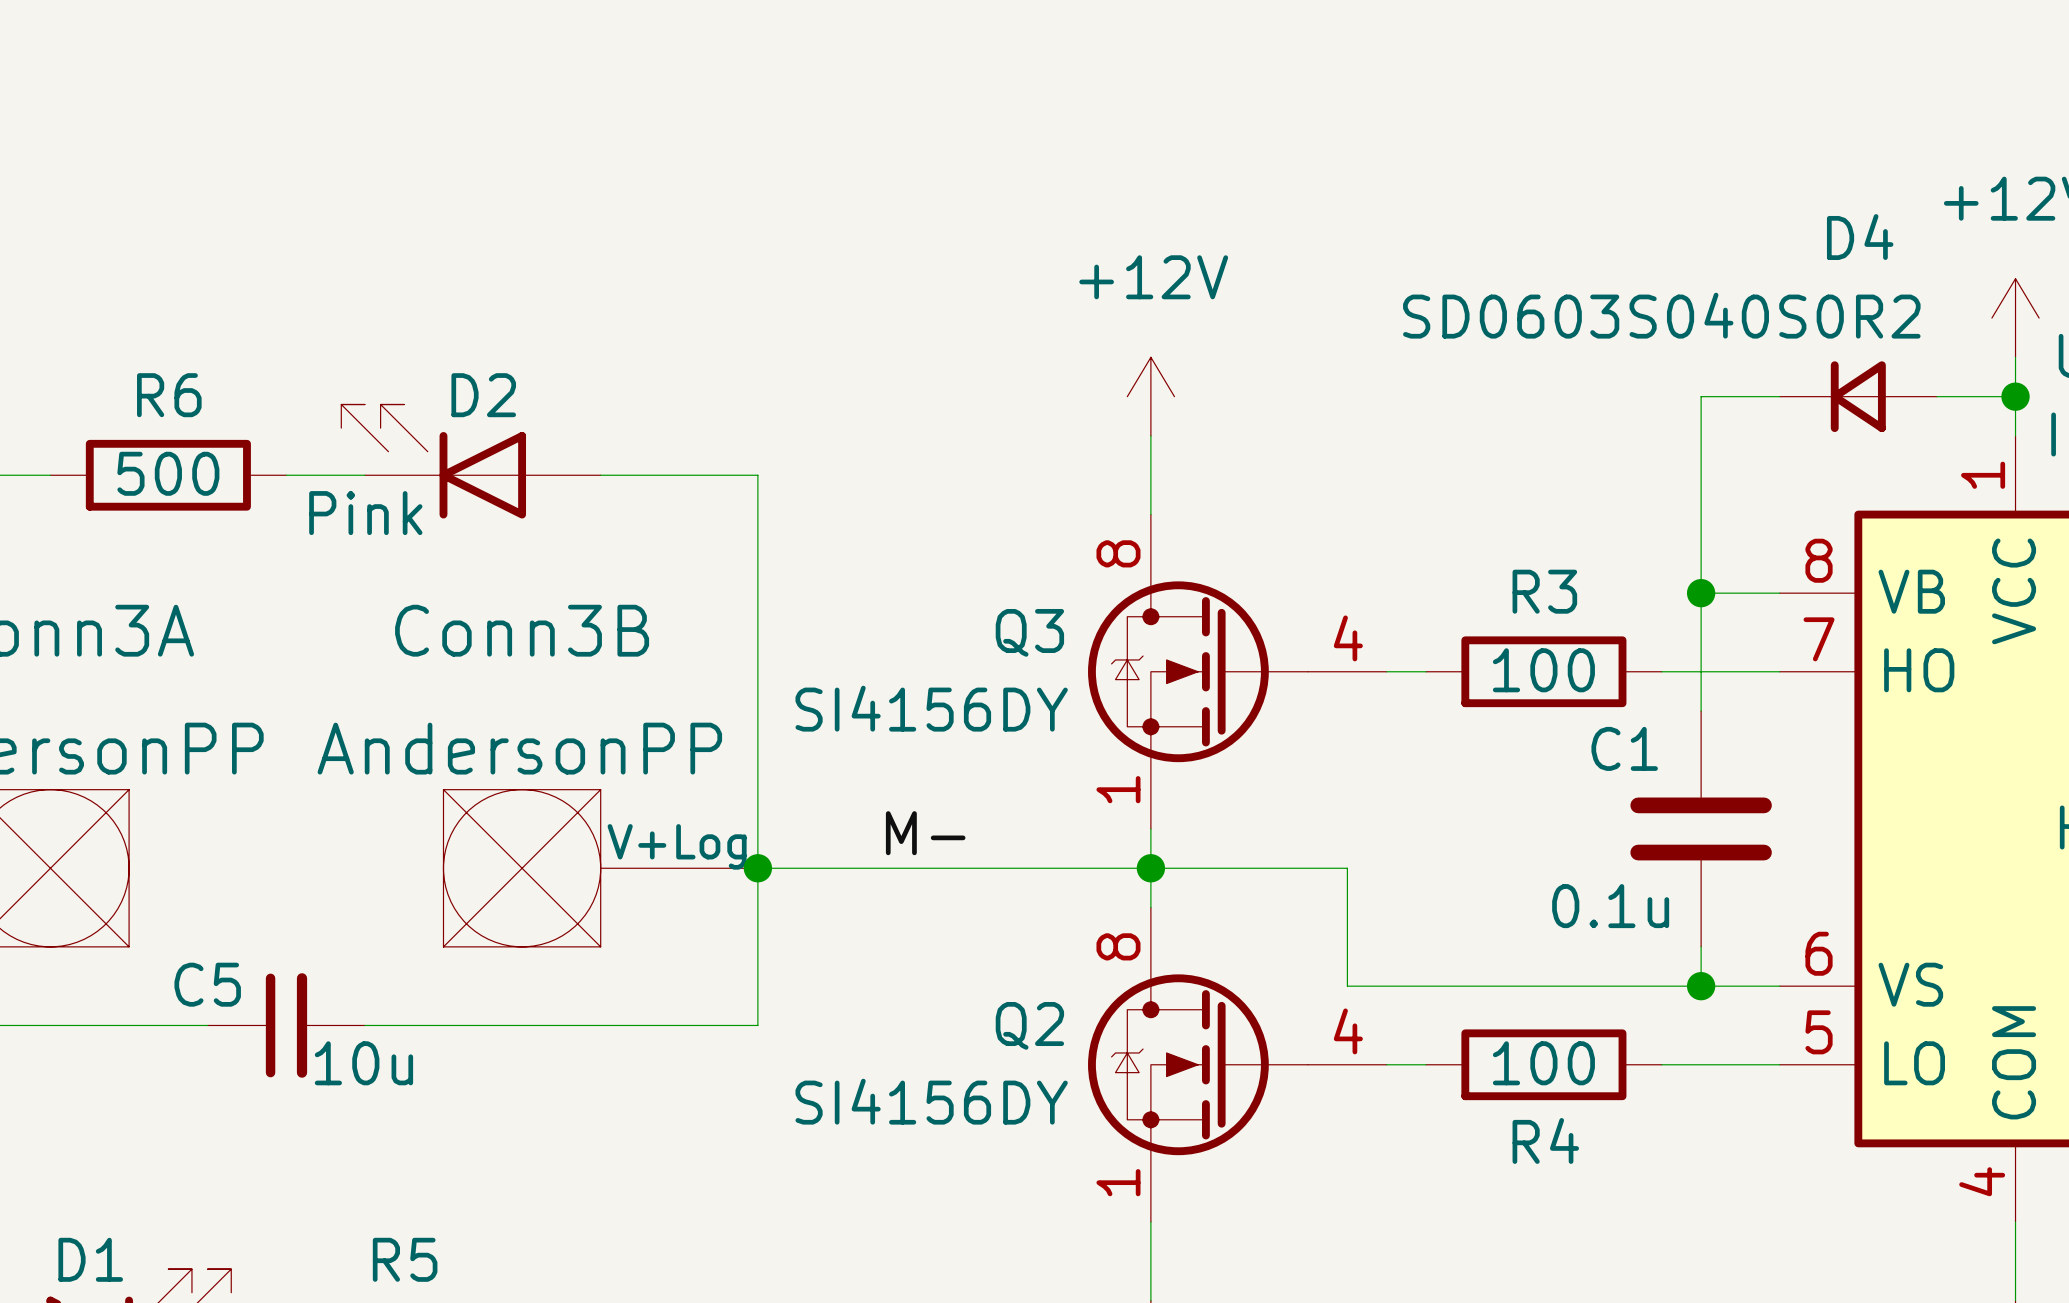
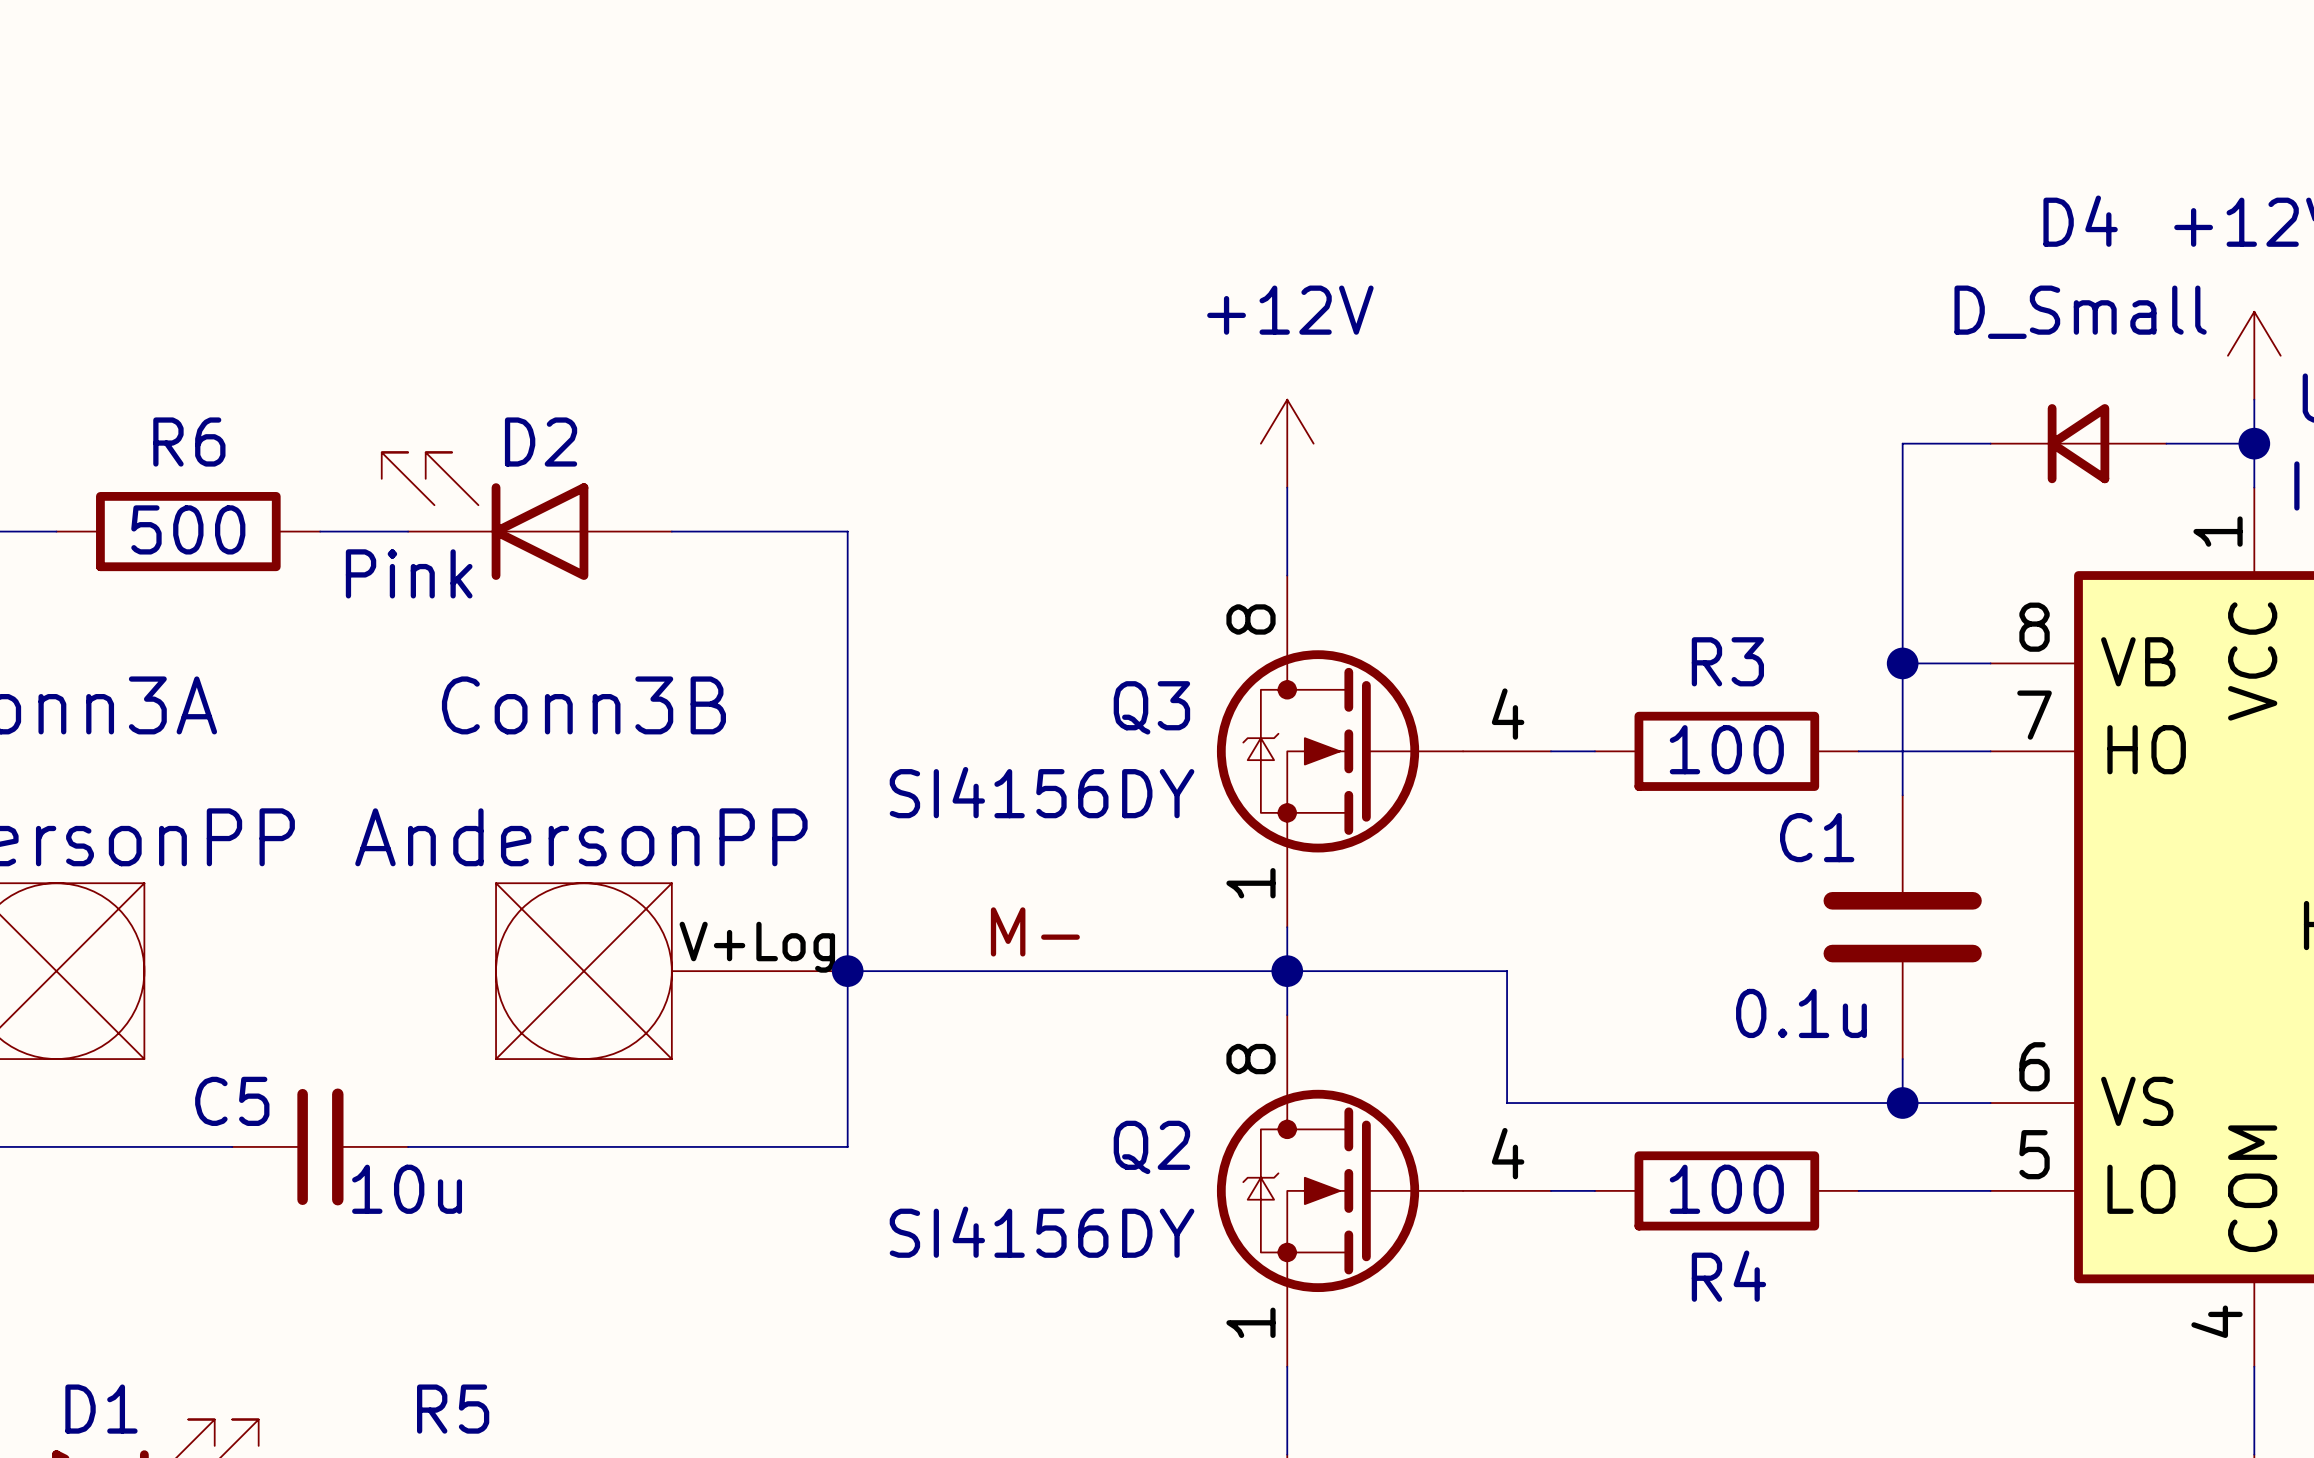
D4 name position: D4 (1860, 237) -> D4 (2080, 221)
D4 value: SD0603S040S0R2 (1661, 315) -> D_Small (2080, 312)

